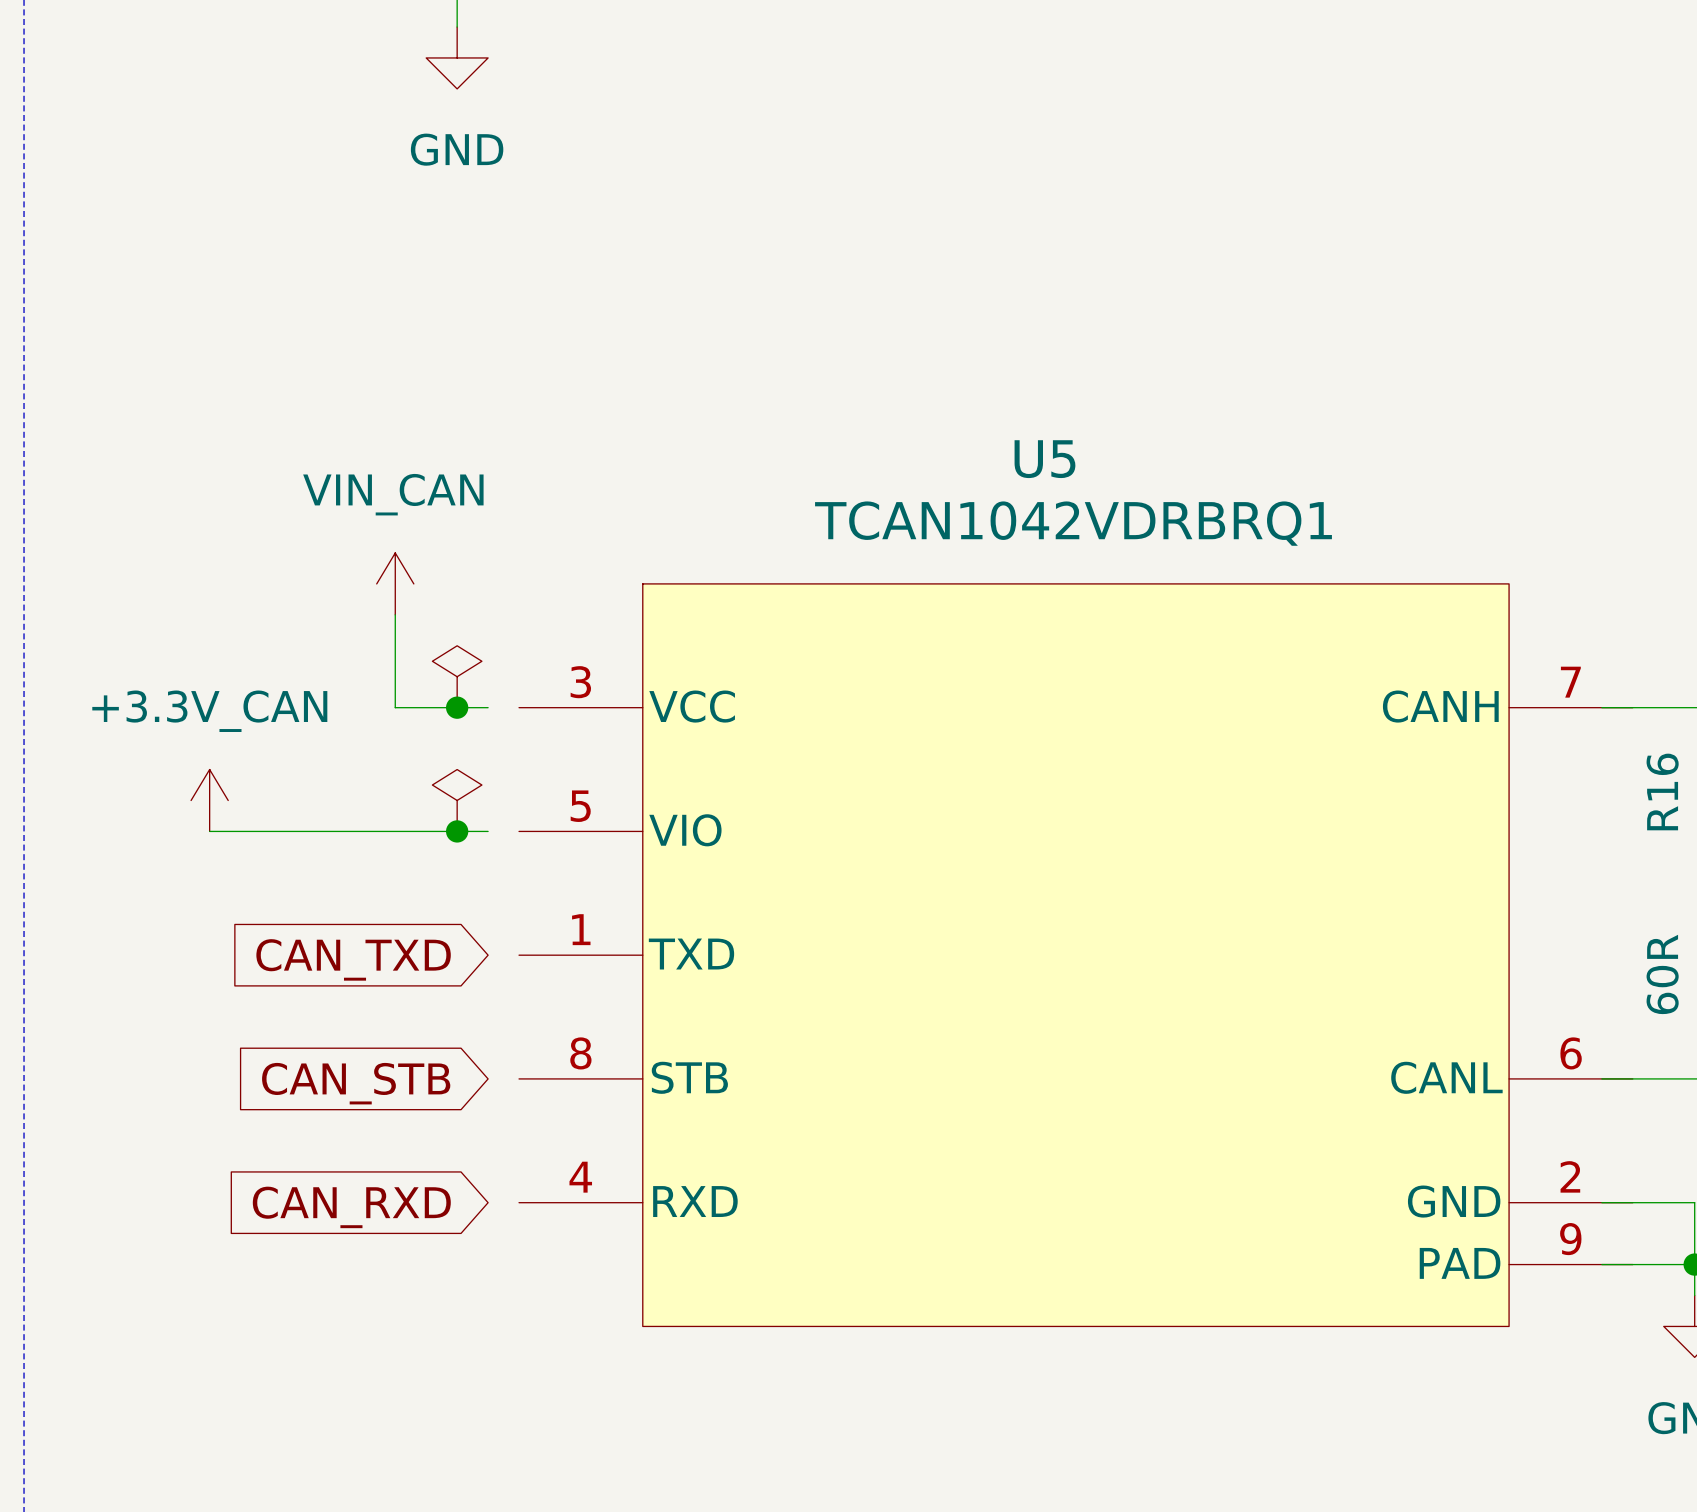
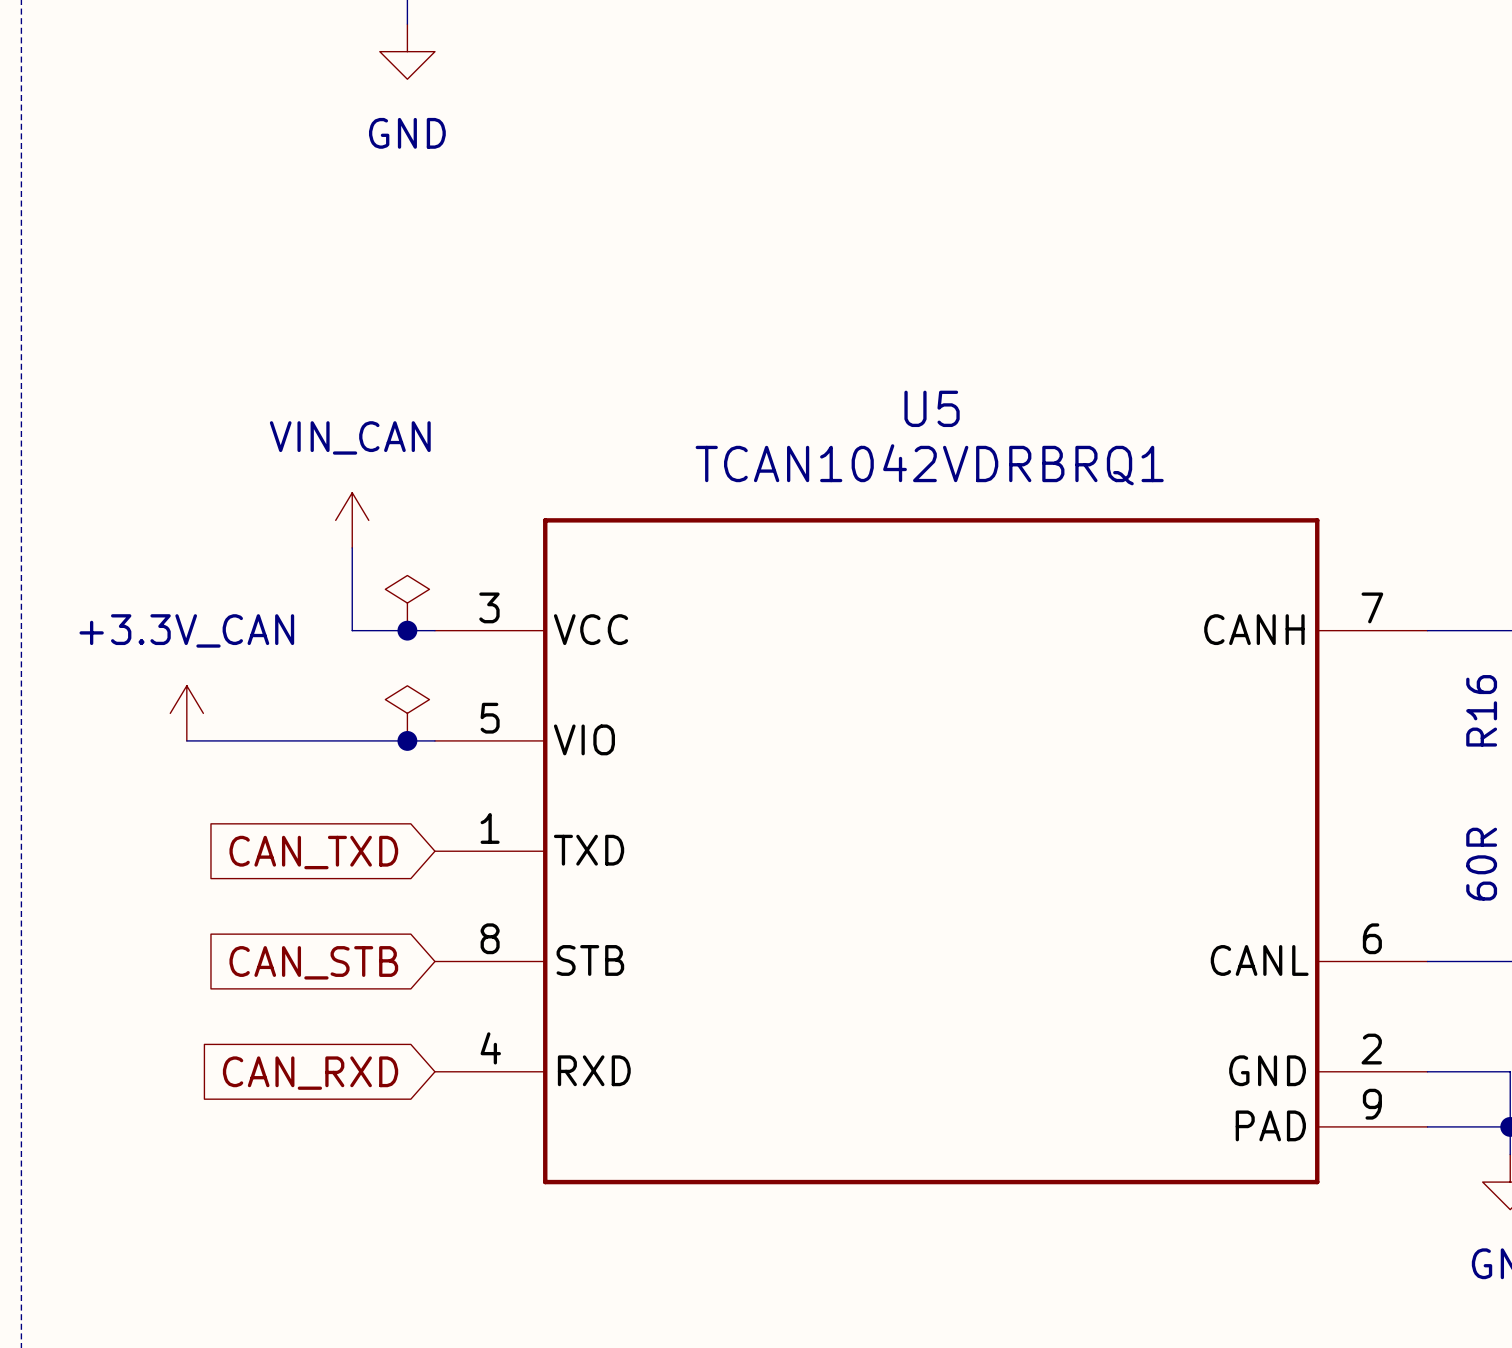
U5 symbol: [519, 583, 1633, 1327] -> [434, 518, 1428, 1185]

